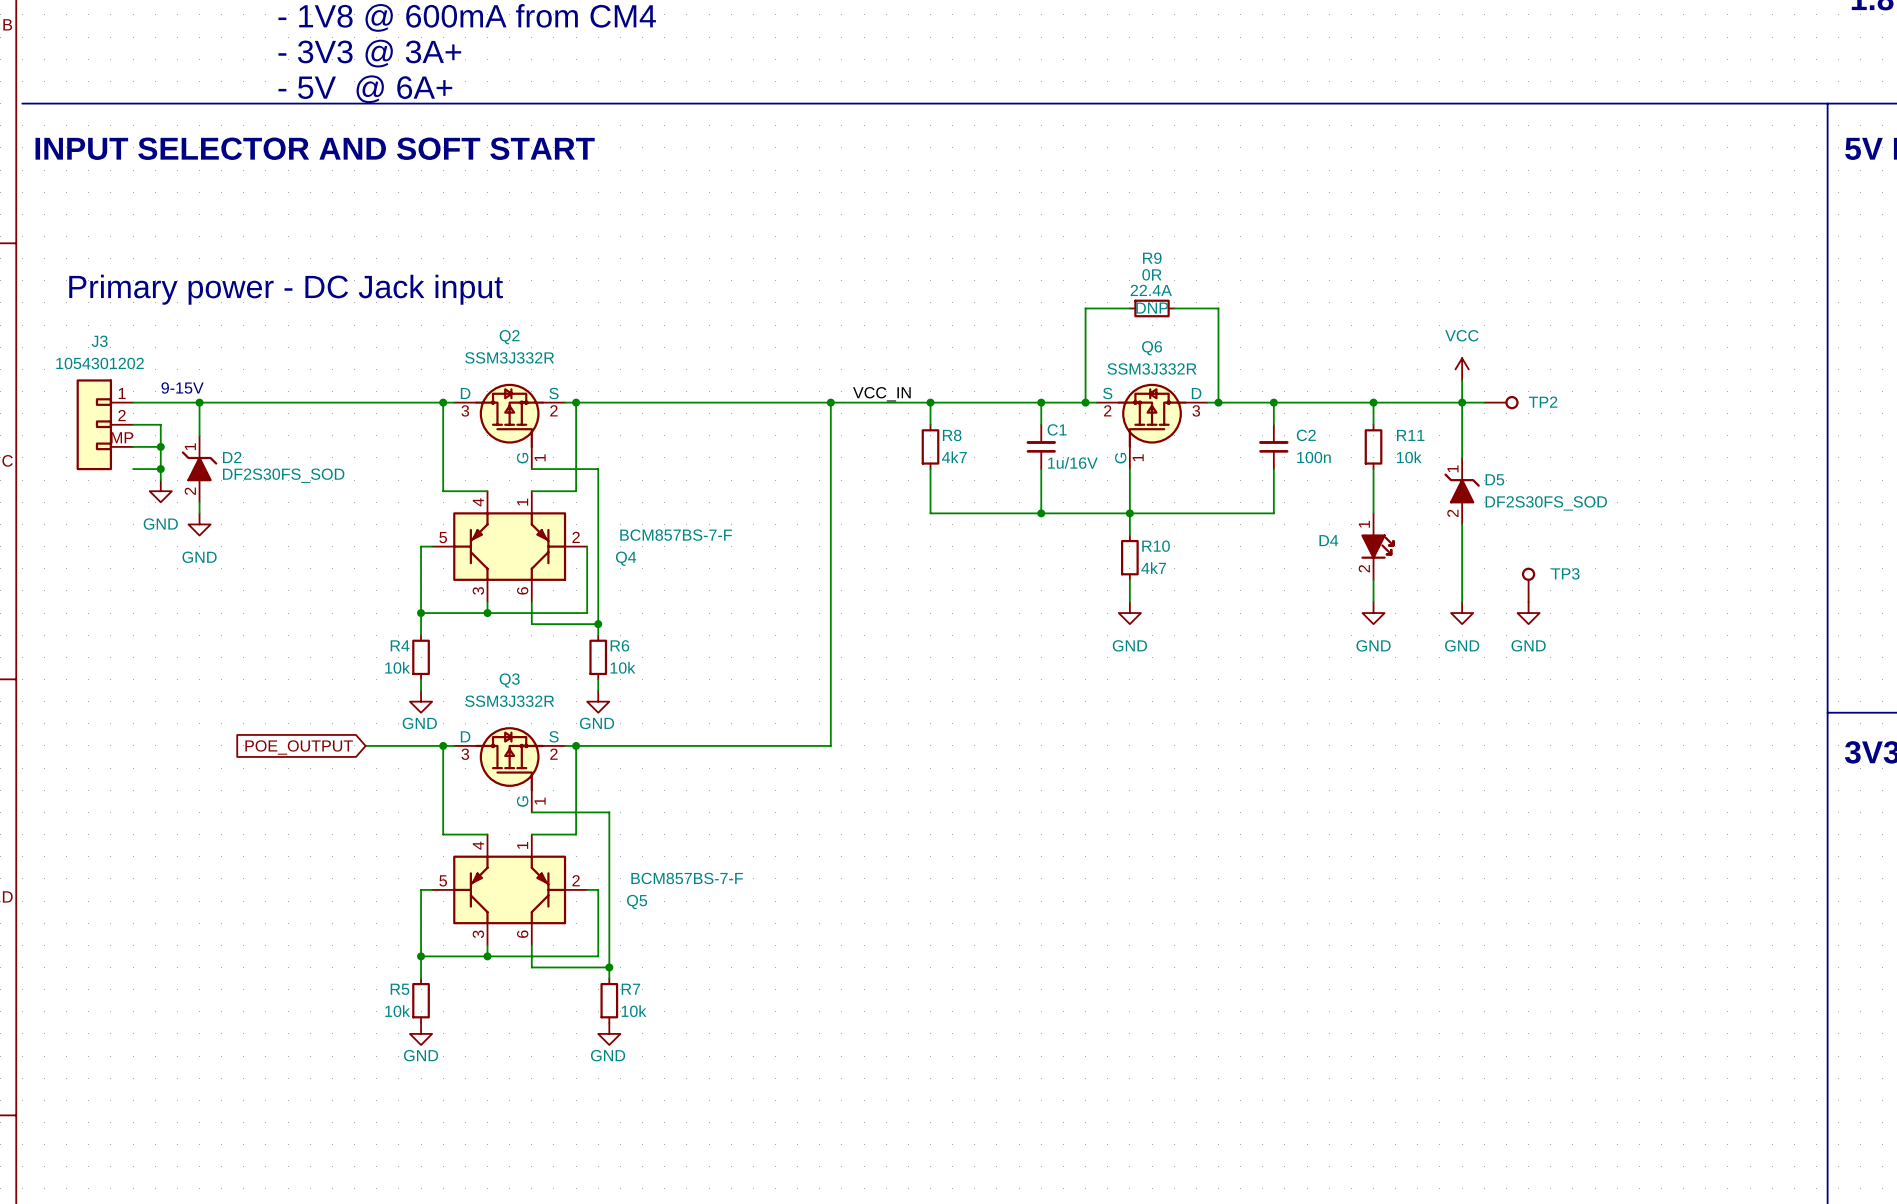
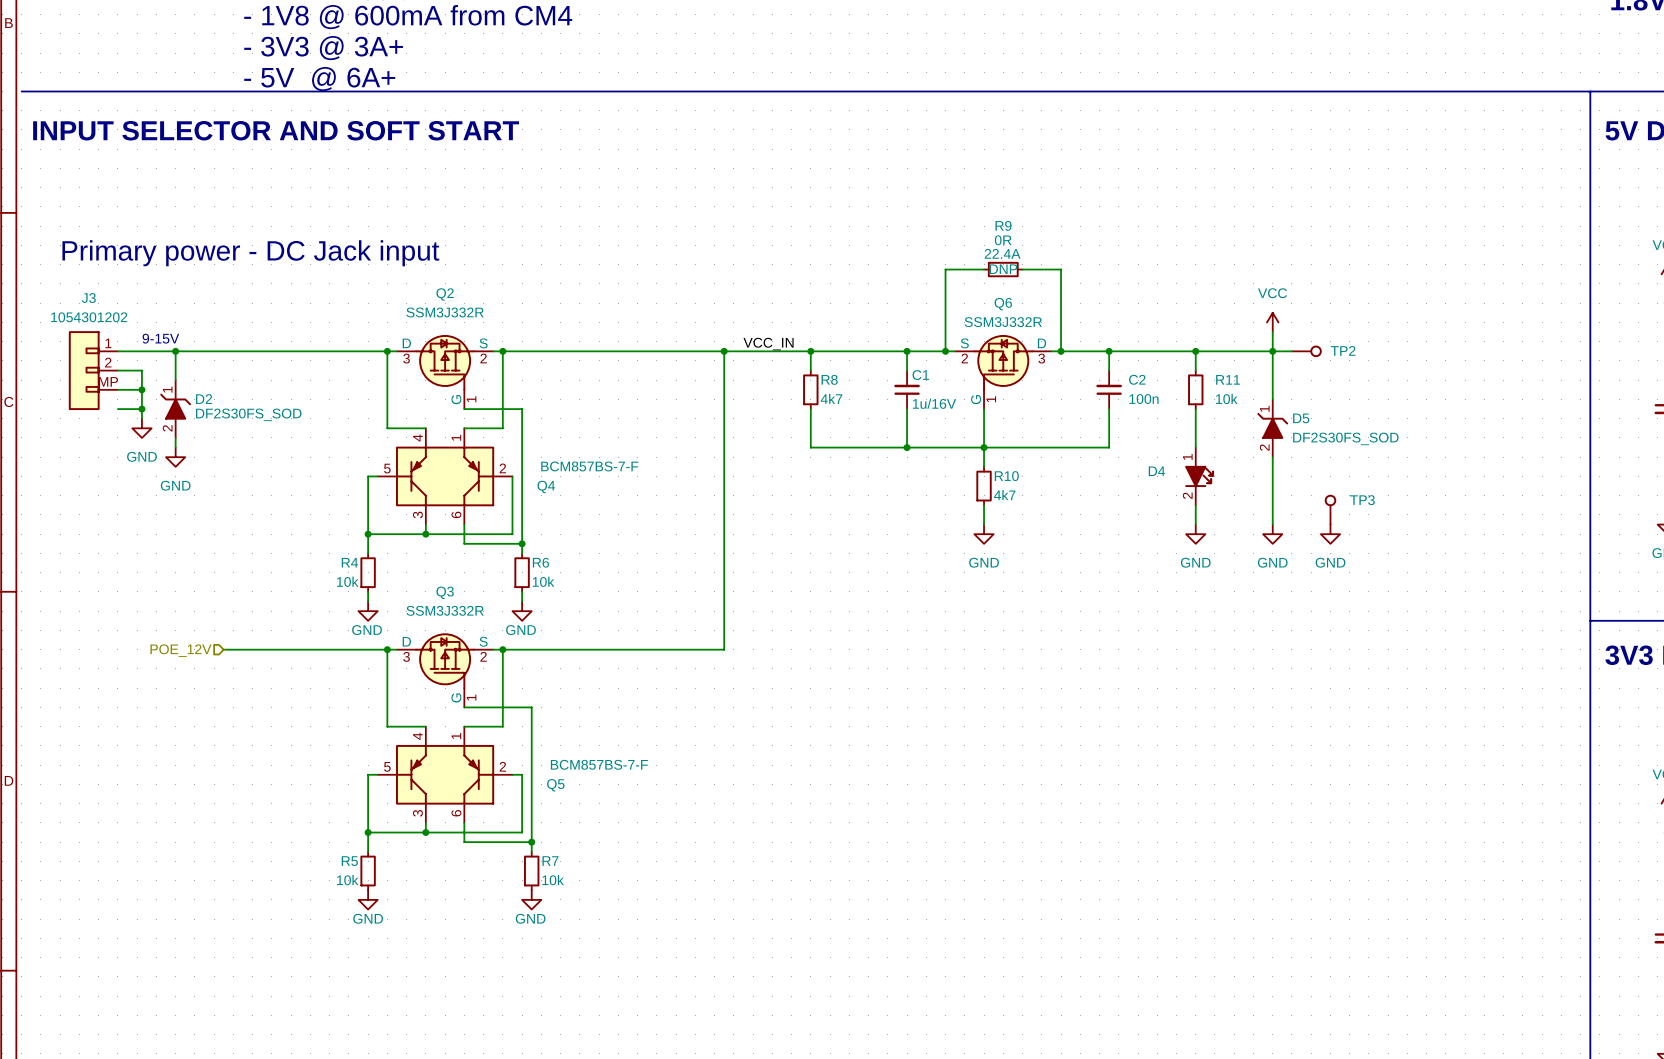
wire: none -> (223, 649) (319, 649)
hierarchical label: none -> POE_12V (180, 650)
global label: POE_OUTPUT (299, 747) -> none

